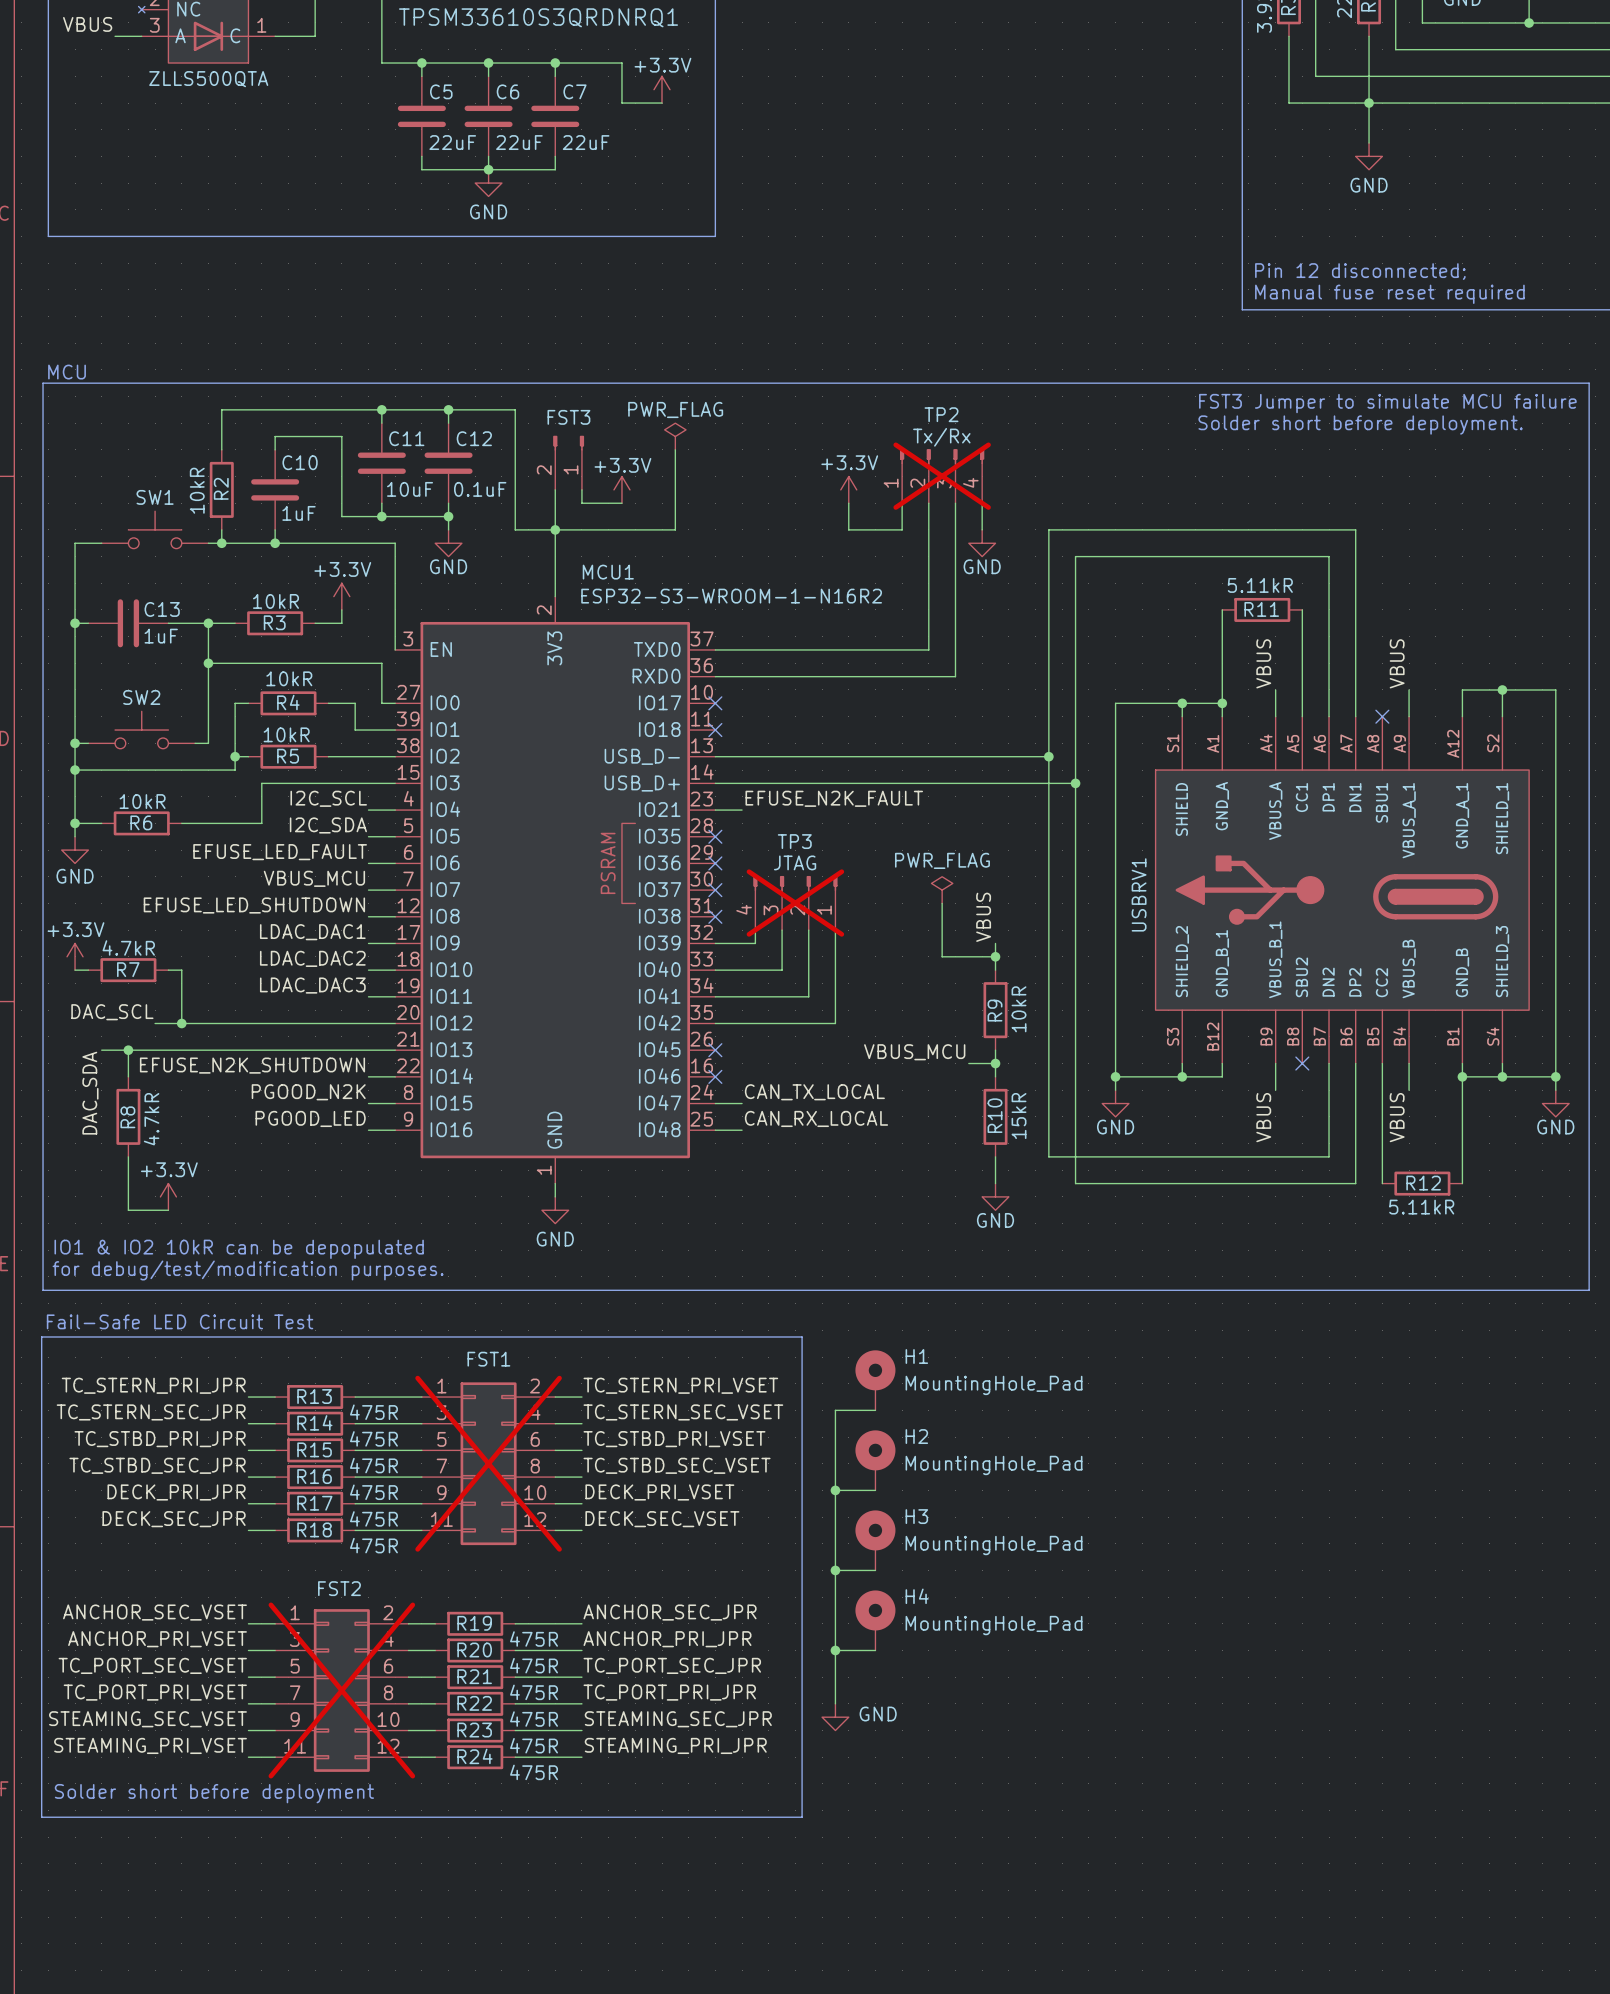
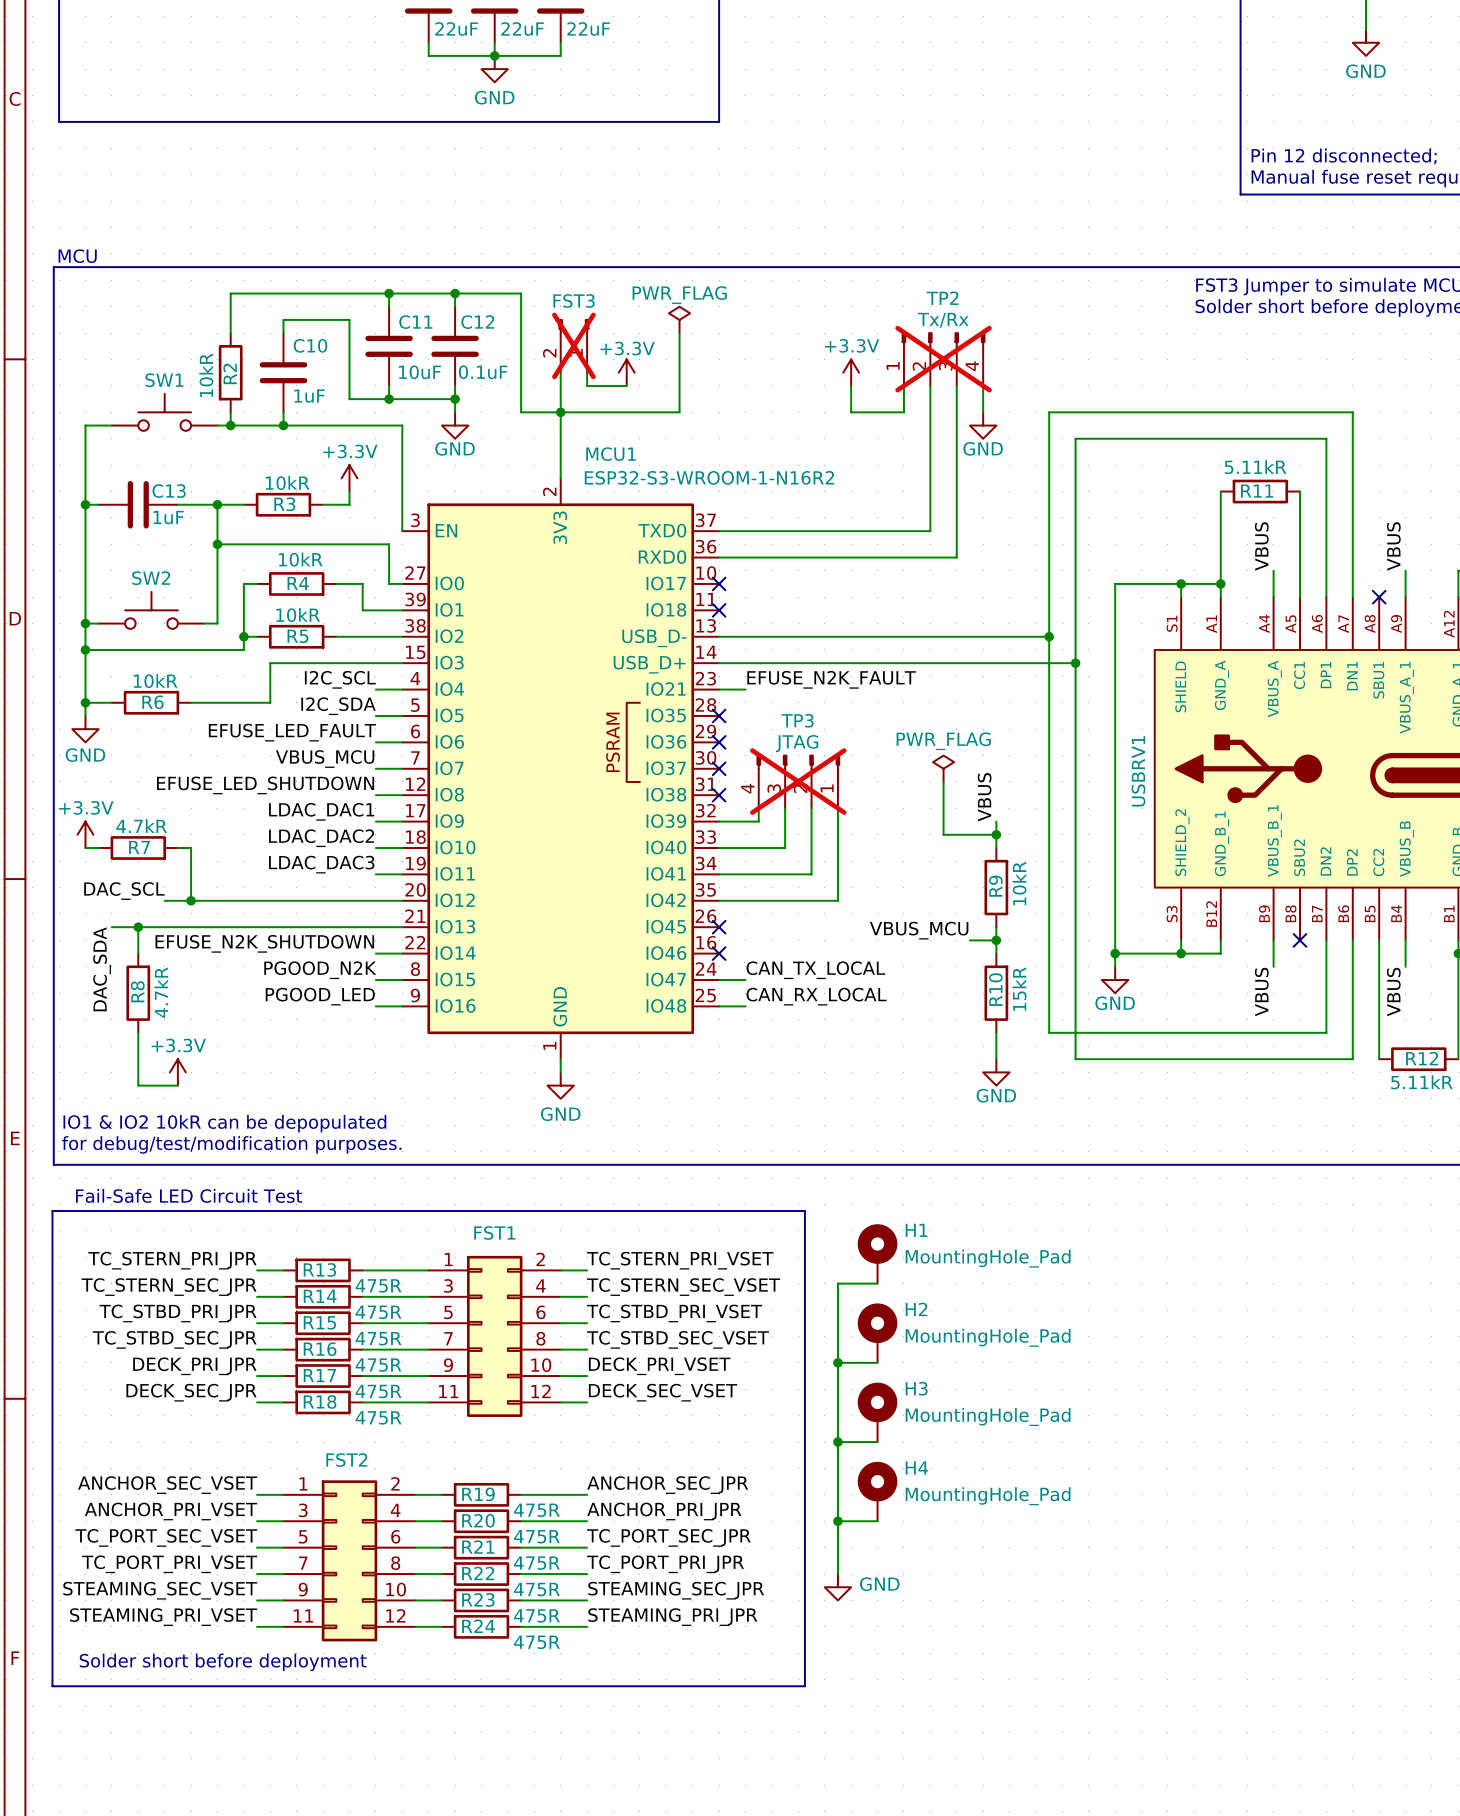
FST3 do-not-place cross: none -> (573, 345)
FST1 do-not-place cross: (488, 1463) -> none
FST2 do-not-place cross: (341, 1690) -> none

